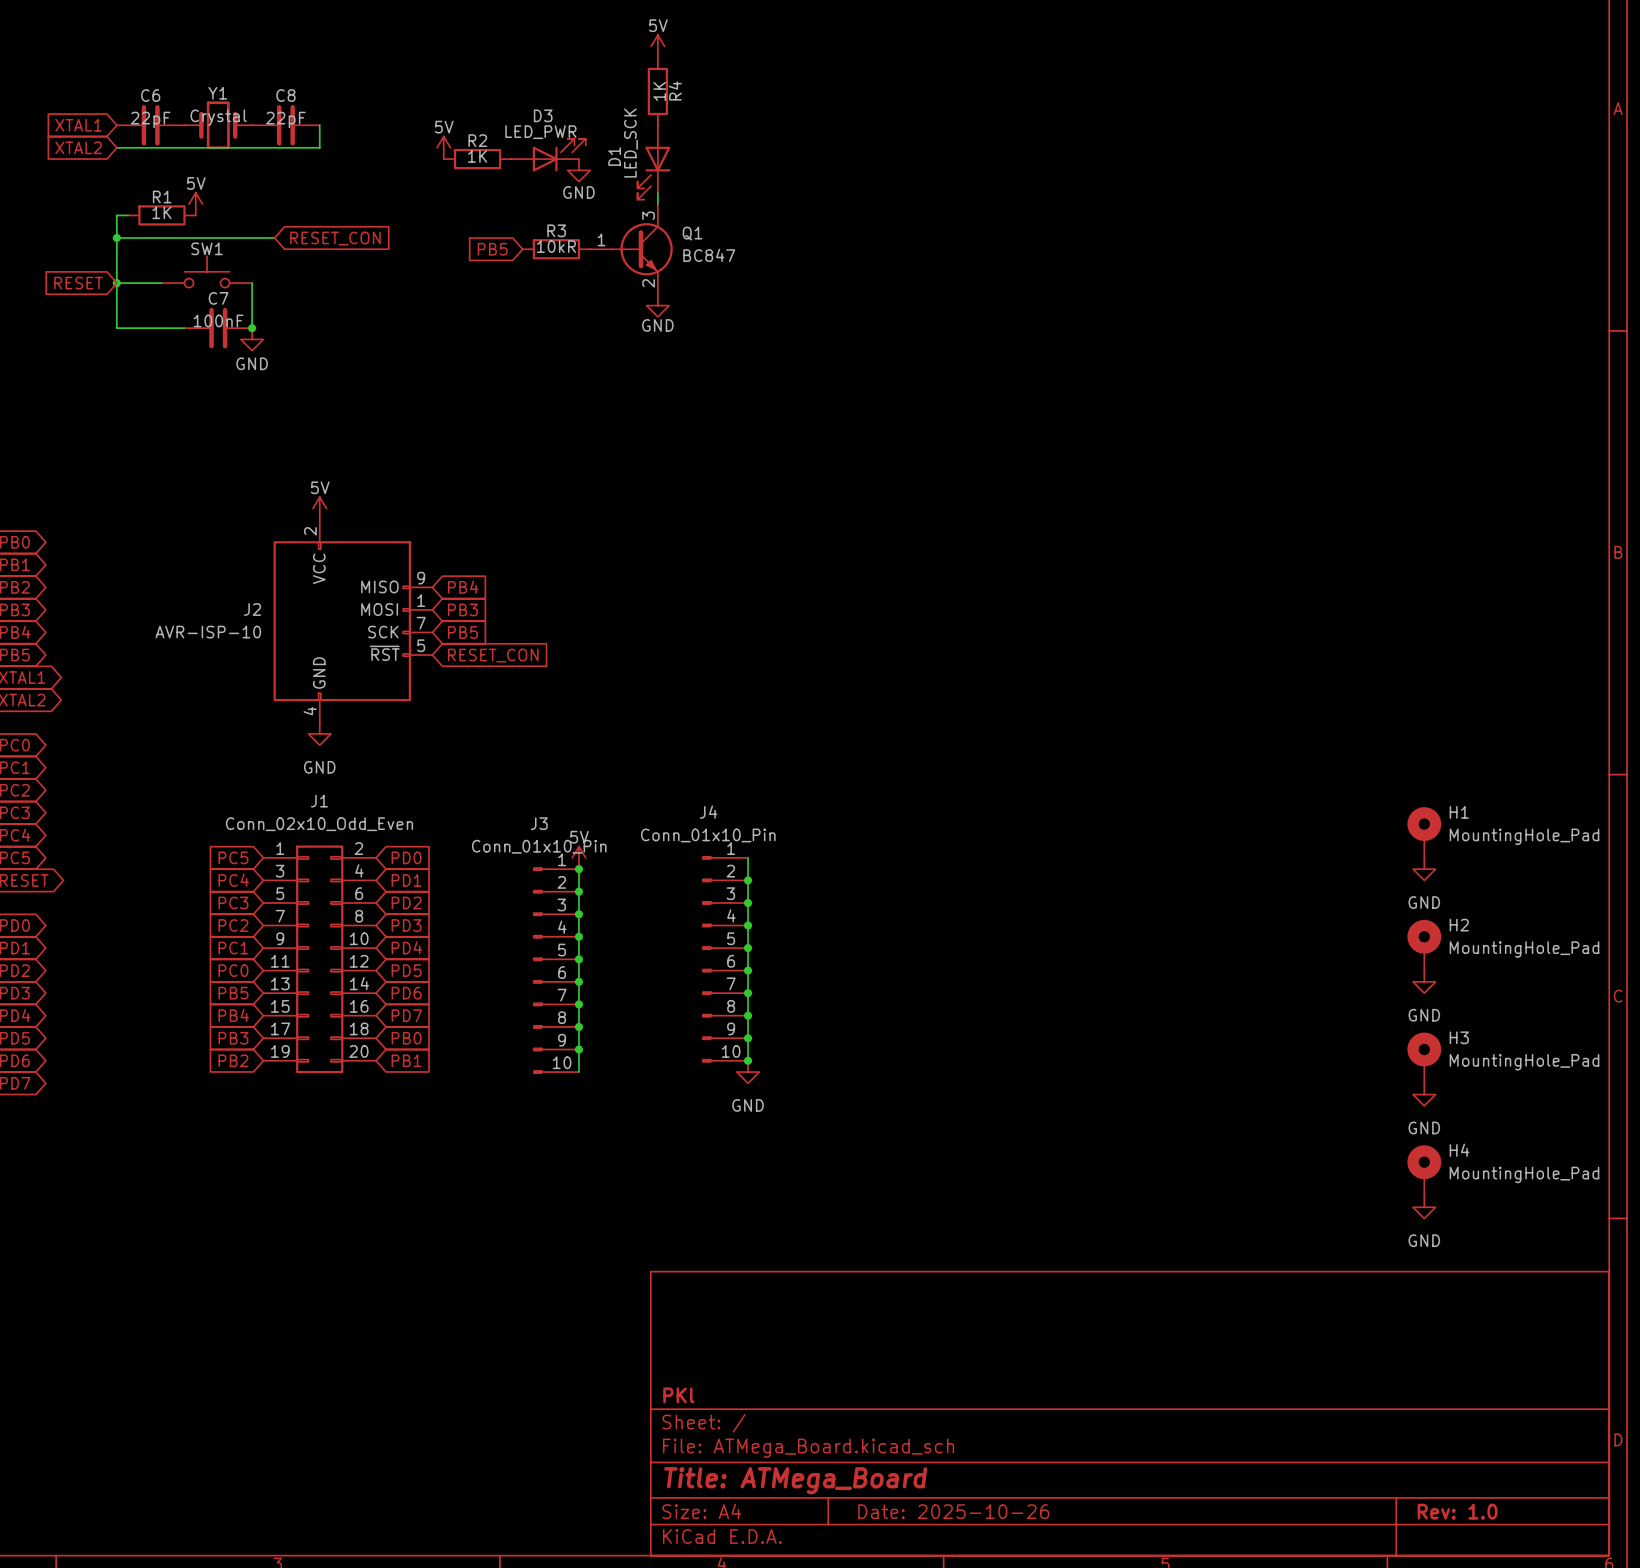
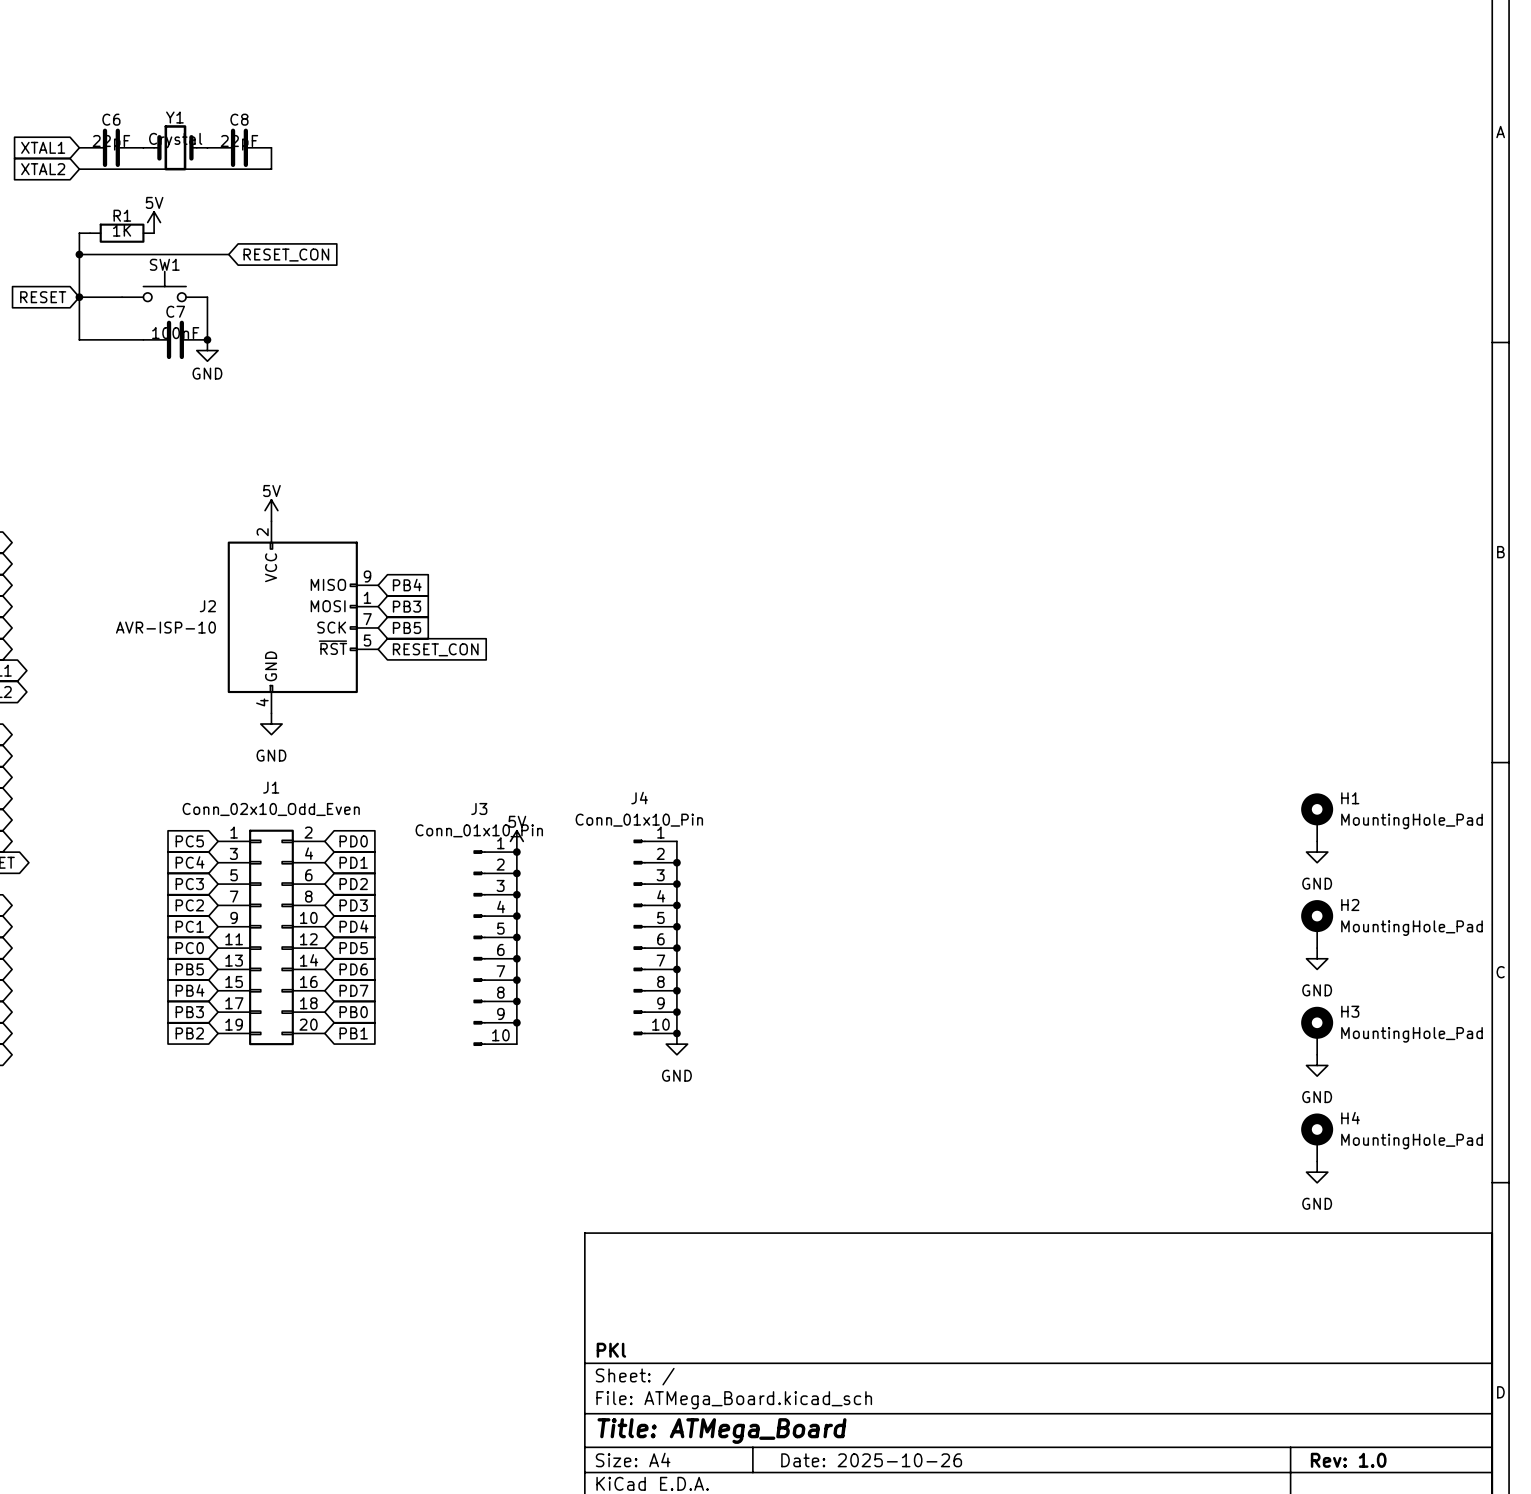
power symbol: 5V (657, 46) -> none
R4: 1K (657, 91) -> none
power symbol: 5V (443, 147) -> none
D3: LED_PWR (548, 155) -> none
R2: 1K (477, 159) -> none
D1: LED_SCK (653, 162) -> none
power symbol: GND (578, 170) -> none
wire: (657, 192) (657, 204) -> none
global label: PB5 (492, 249) -> none
R3: 10kR (556, 249) -> none
Q1: BC847 (631, 249) -> none
power symbol: GND (657, 305) -> none

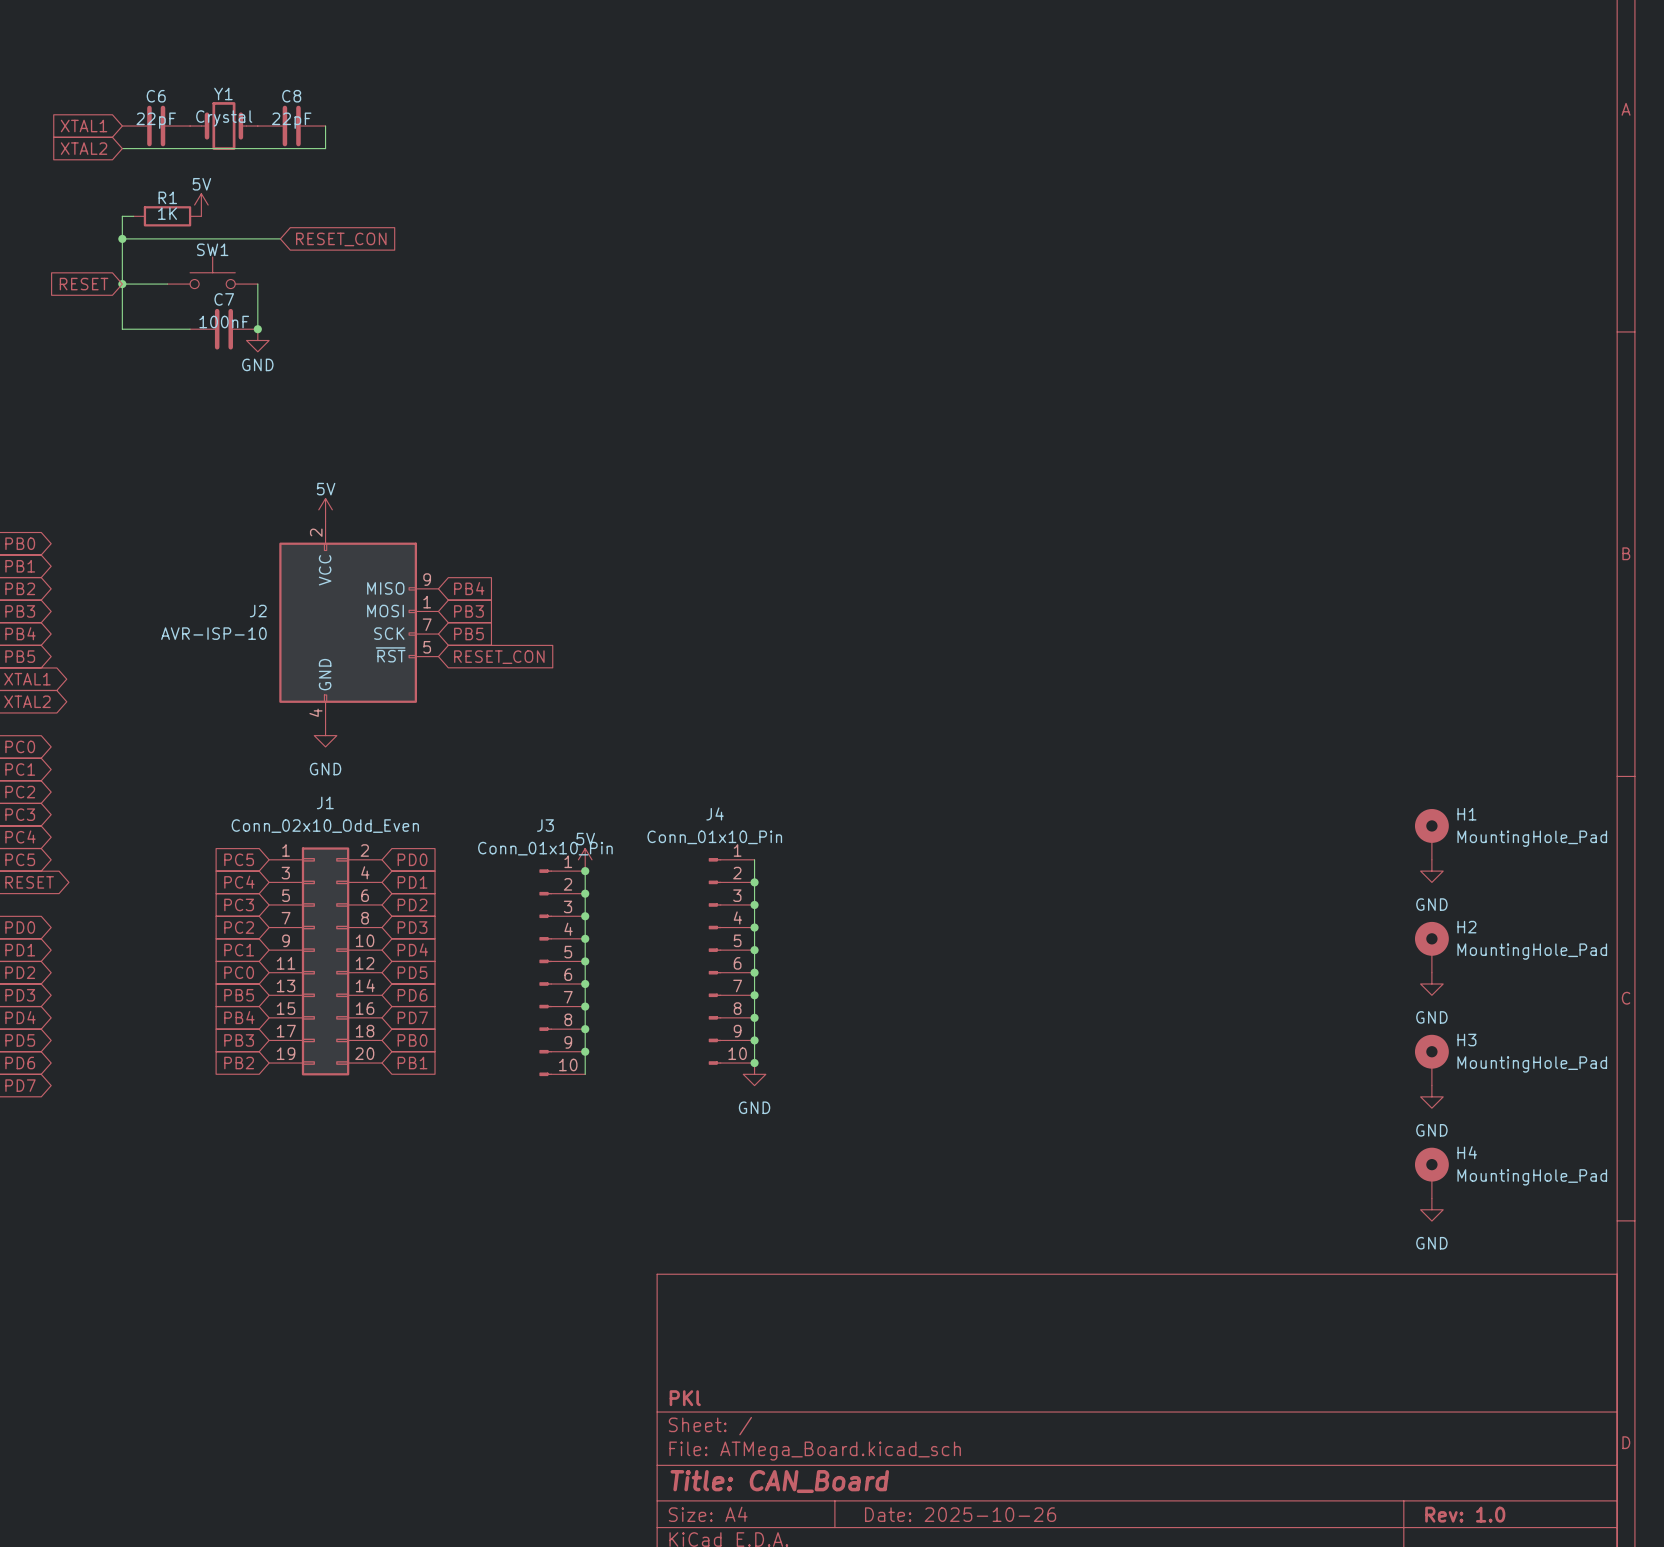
title block: Title: ATMega_Board (721, 1431) -> Title: CAN_Board (779, 1481)

